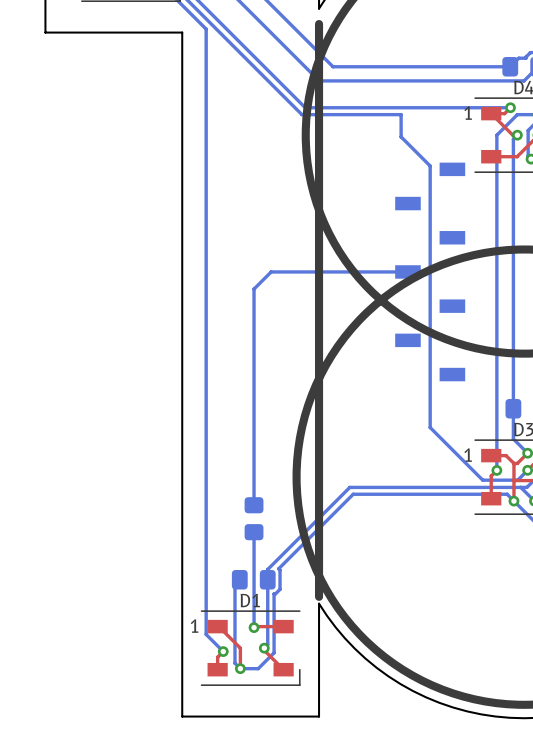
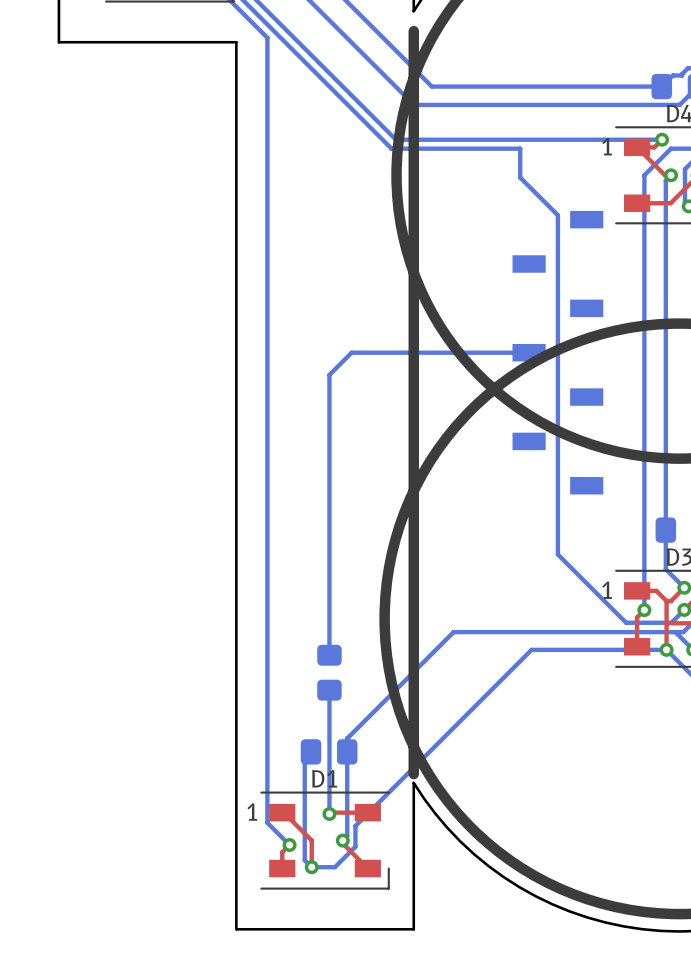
bottom track: (513, 501) (507, 494) (353, 494) (278, 568) (280, 589) (274, 593) (274, 636) -> (666, 649) (531, 649) (355, 826)

